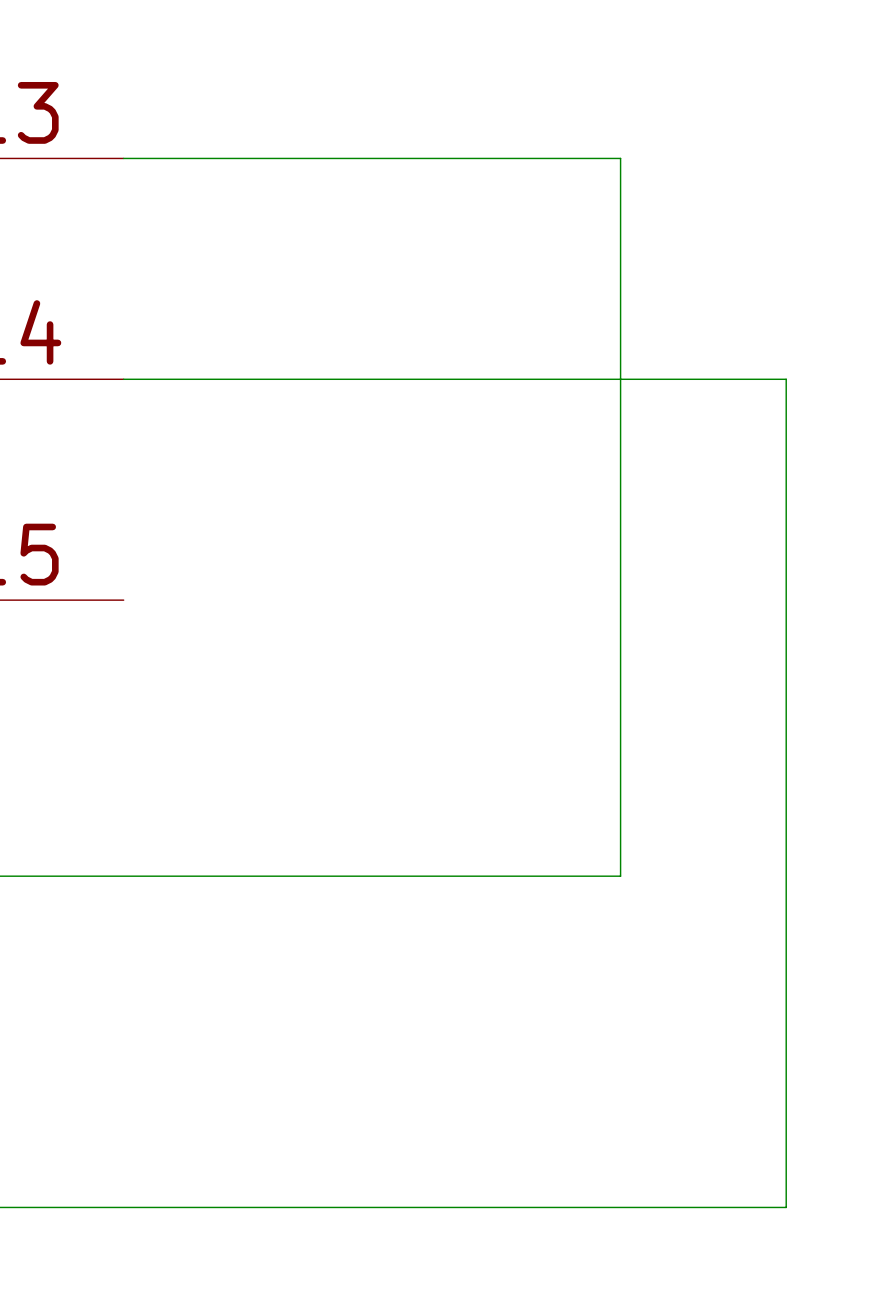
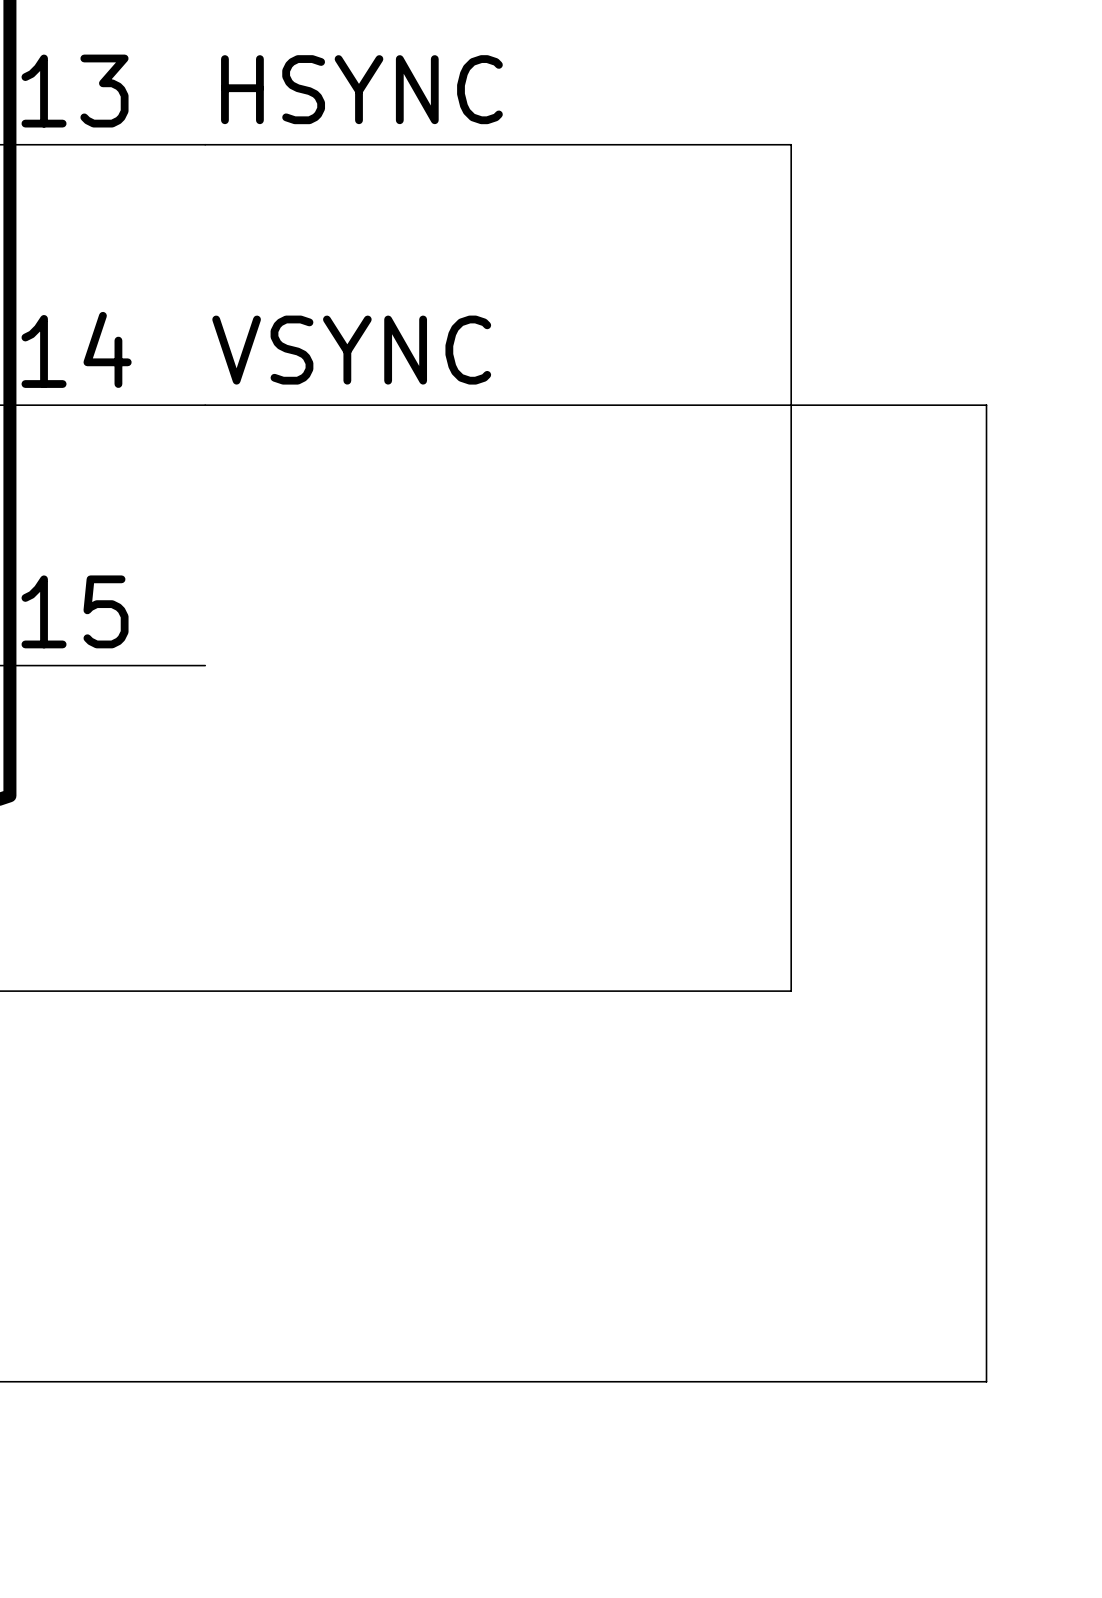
label: none -> HSYNC (361, 89)
label: none -> VSYNC (351, 350)

